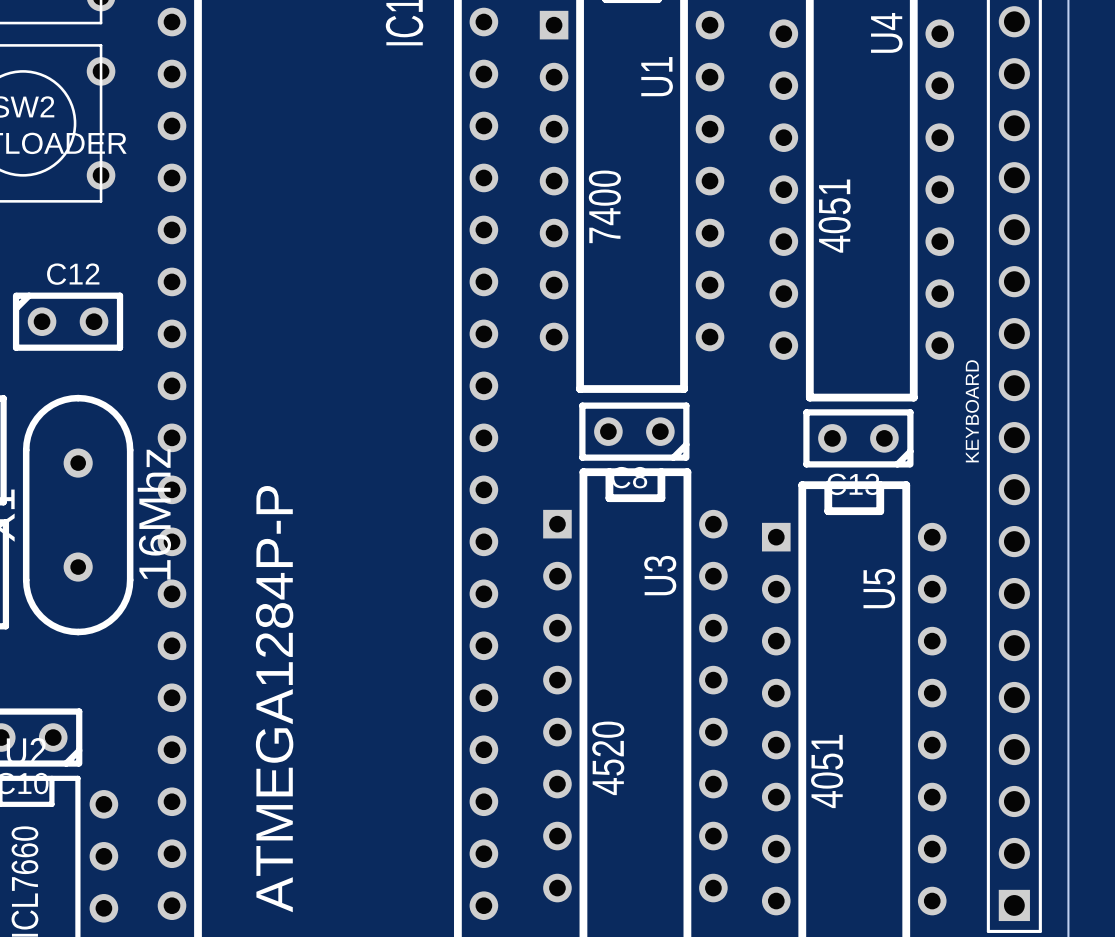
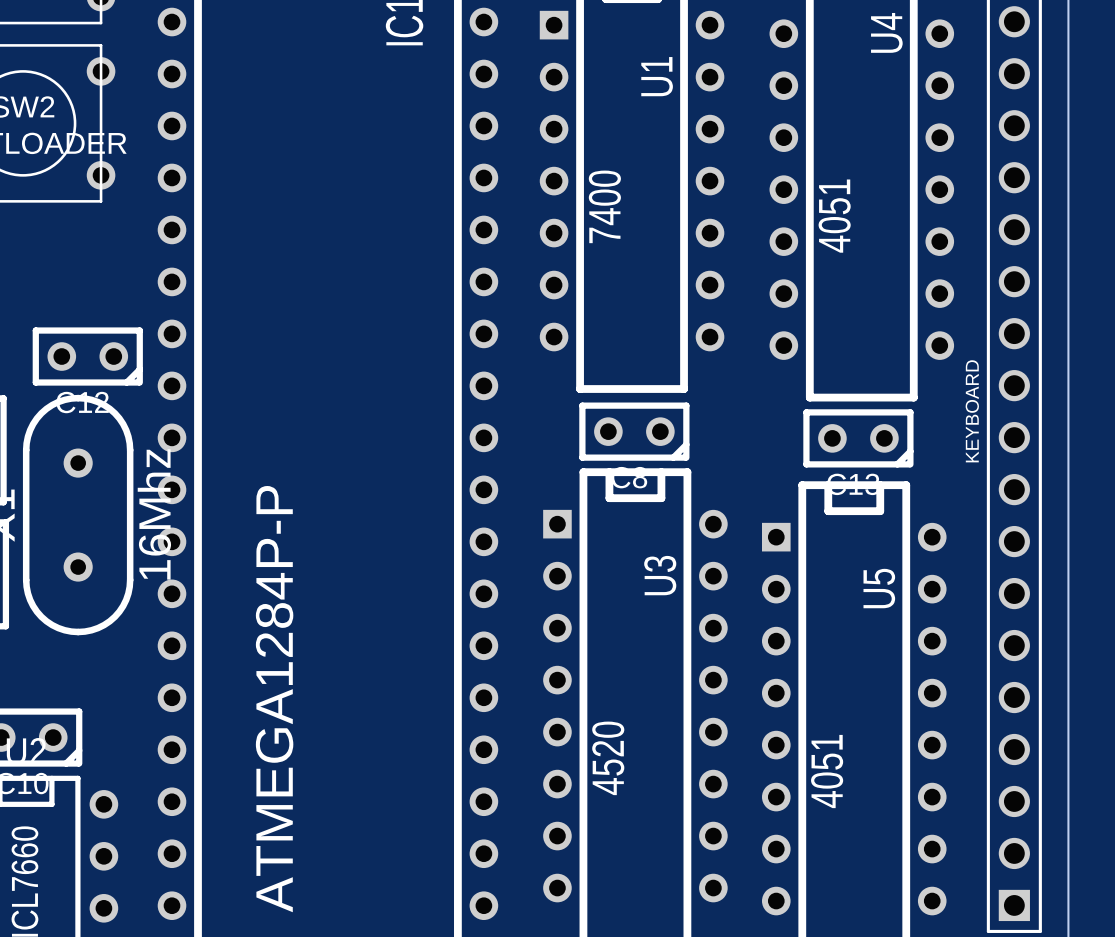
C12 rotation: 0° (68, 321) -> 180° (87, 356)

